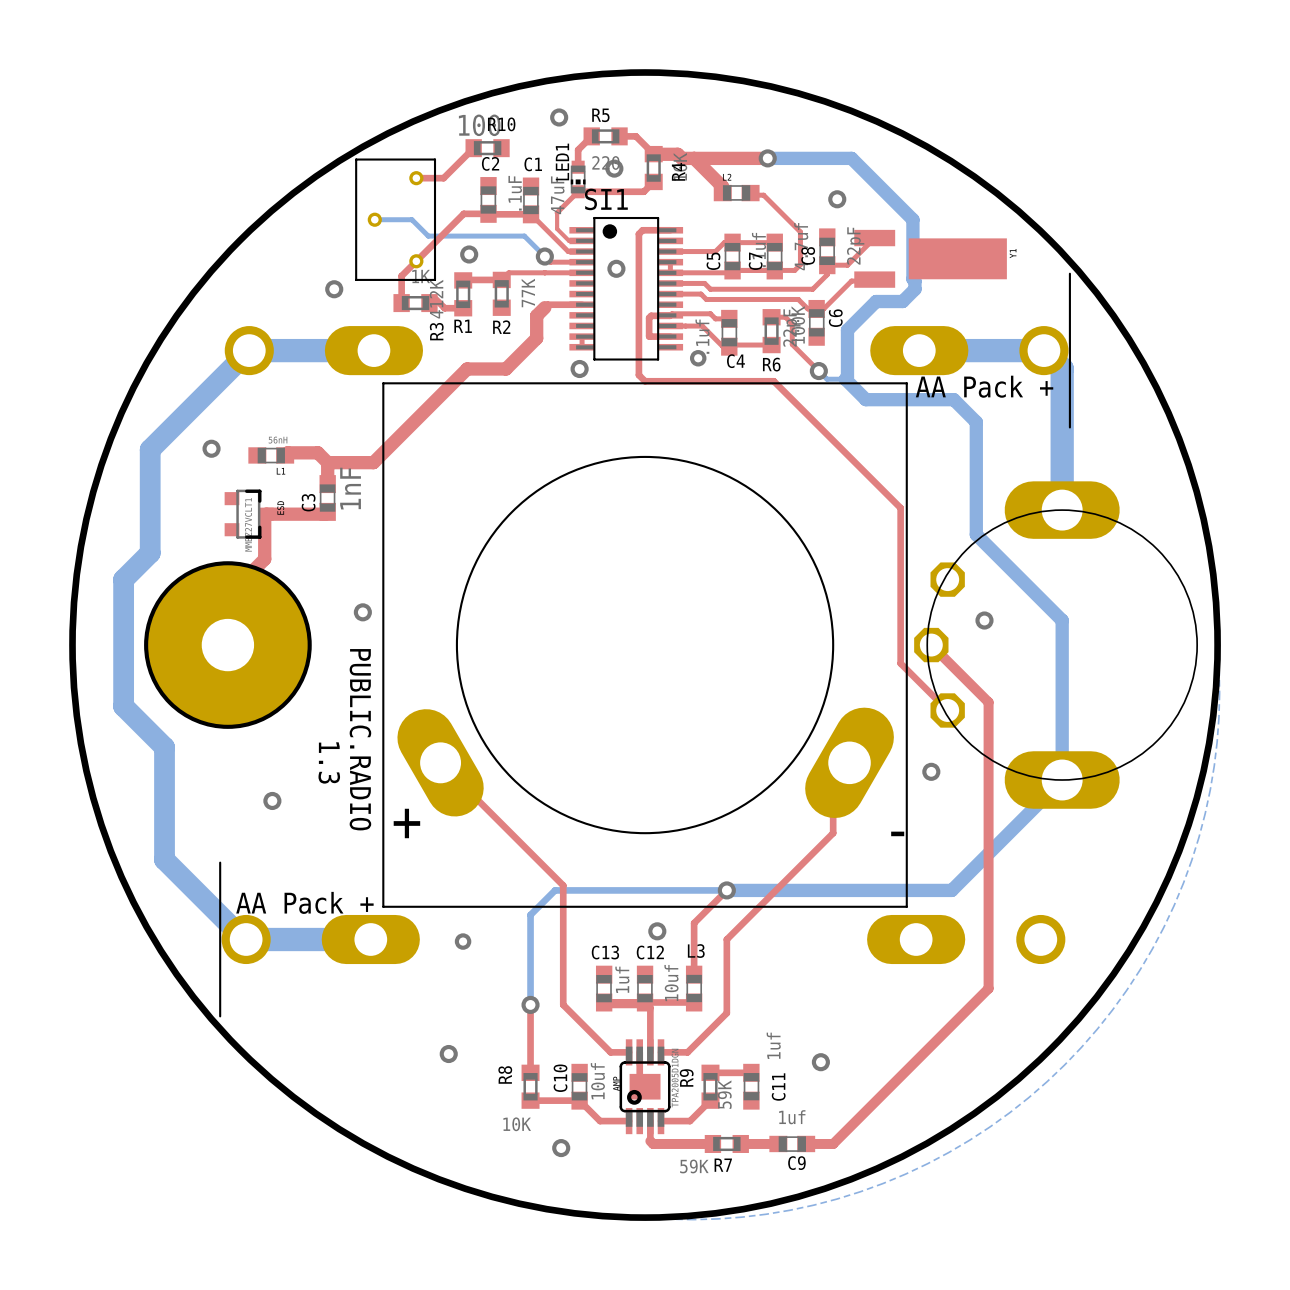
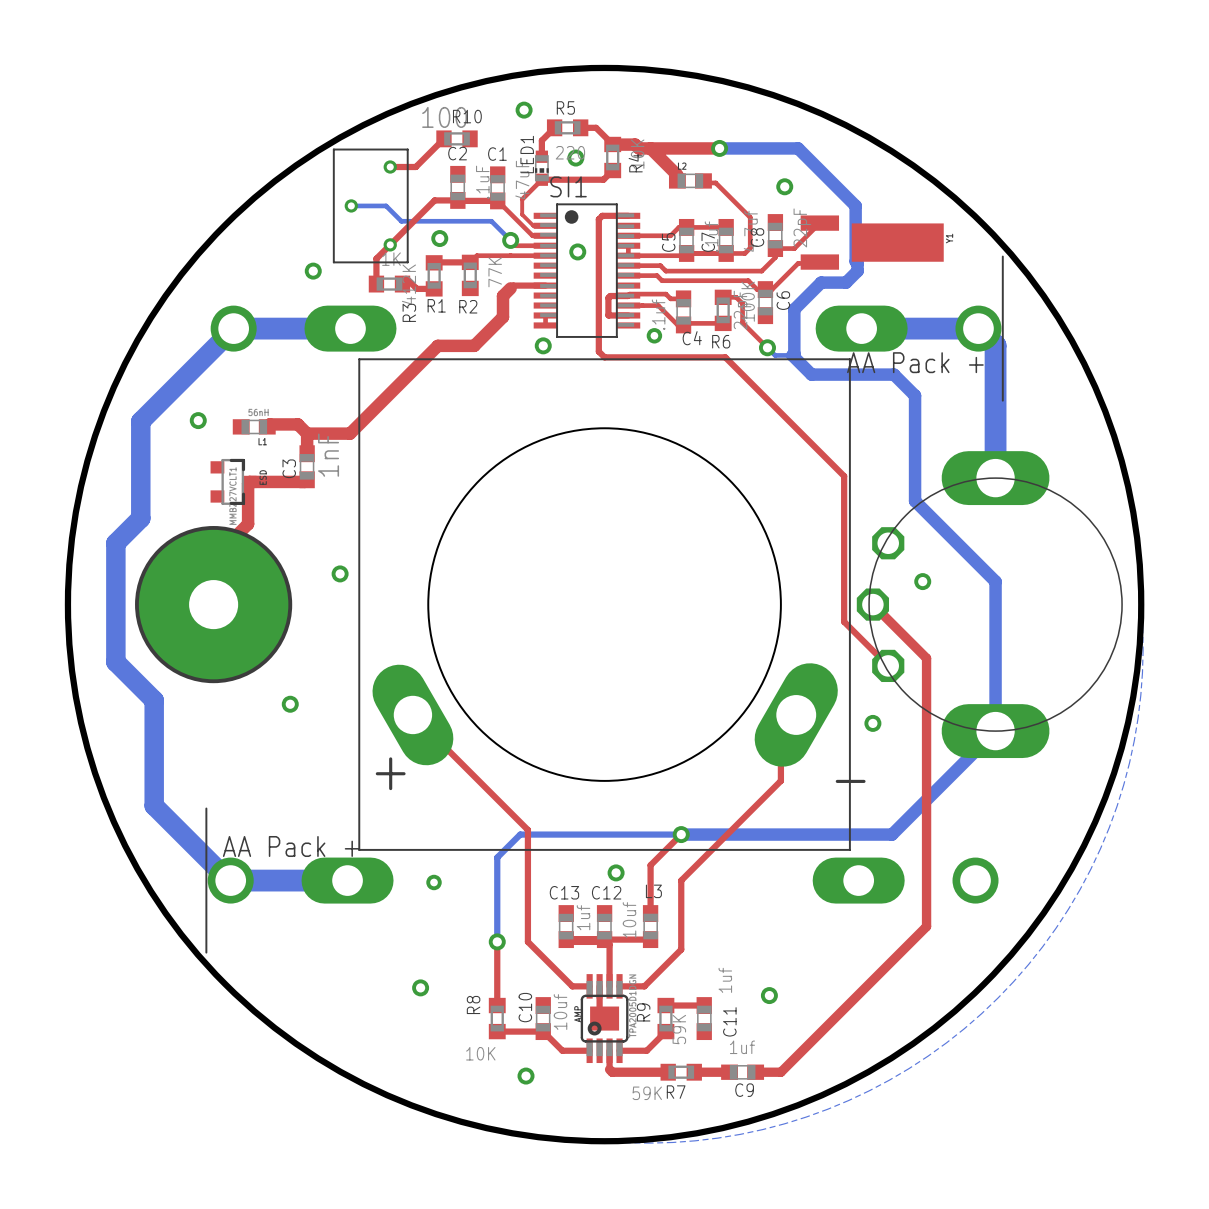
SI1 footprint: [569, 216, 684, 361] -> [533, 203, 641, 338]
text: PUBLIC.RADIO (360, 739) -> none
text: 1.3 (329, 762) -> none
via position: (272, 800) -> (290, 704)

